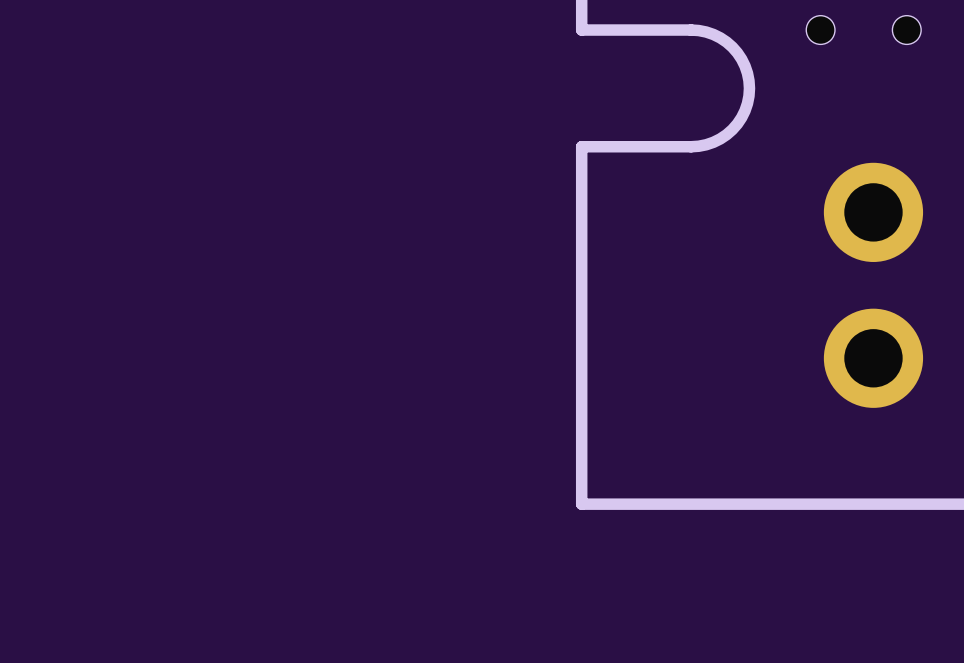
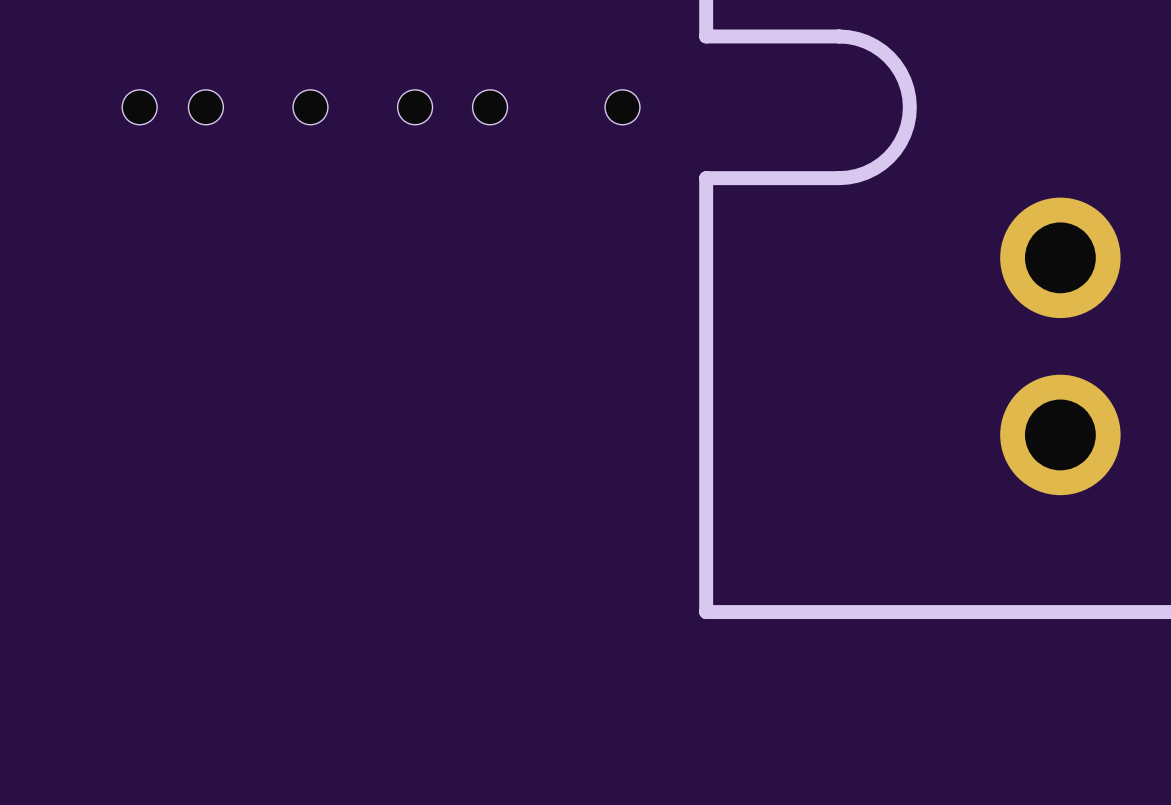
part: (820, 30) -> none
part: (906, 30) -> none
part: none -> (139, 107)
part: none -> (205, 107)
part: none -> (310, 107)
part: none -> (415, 107)
part: none -> (490, 107)
part: none -> (622, 107)

